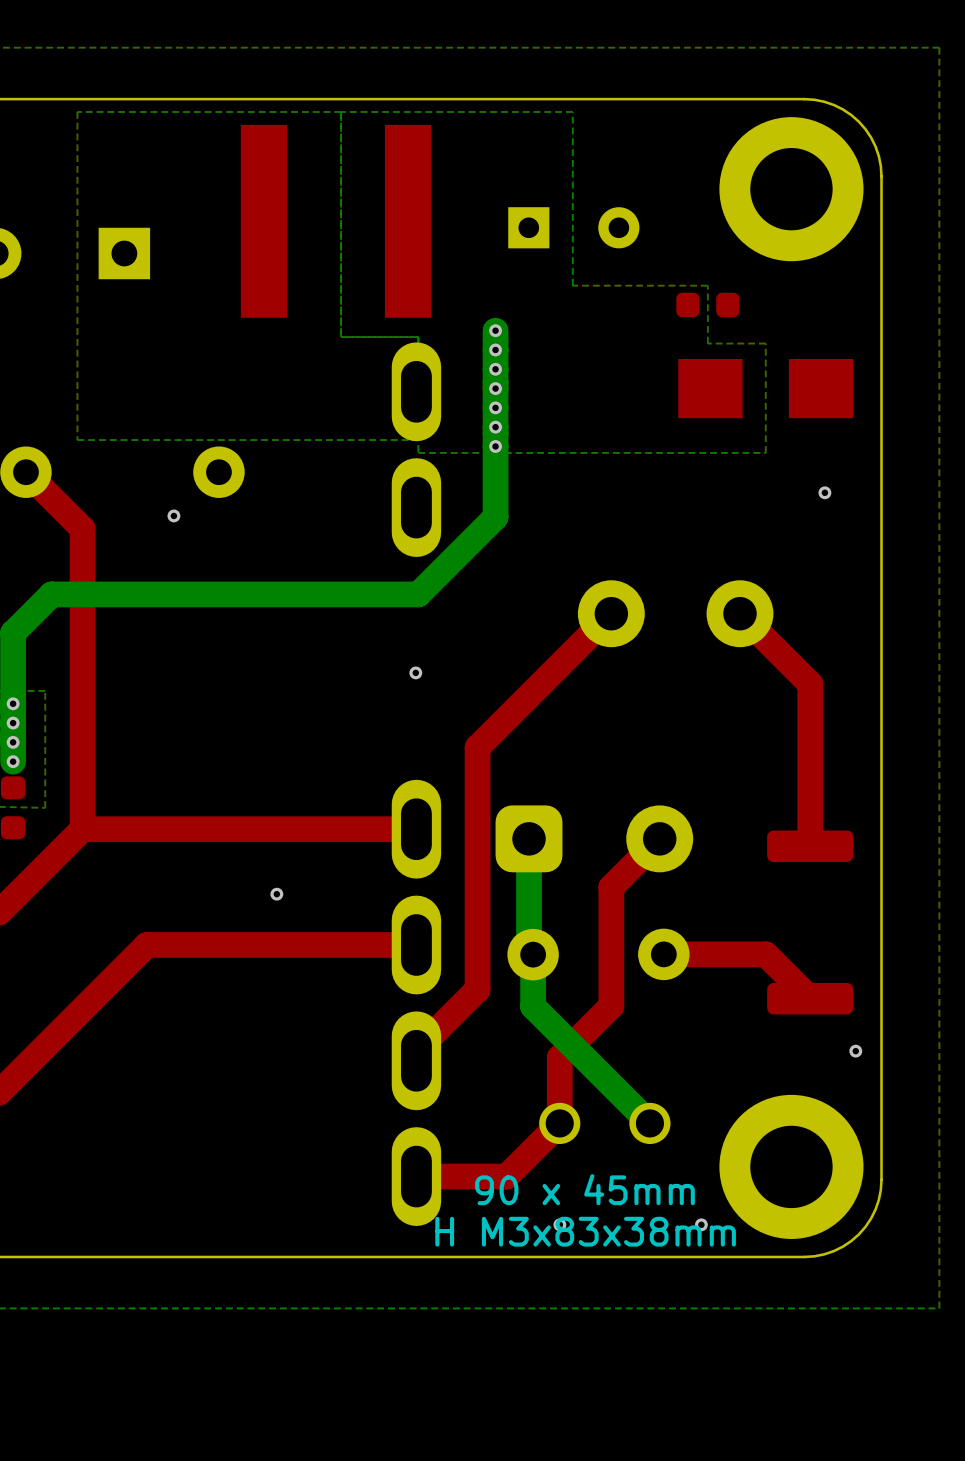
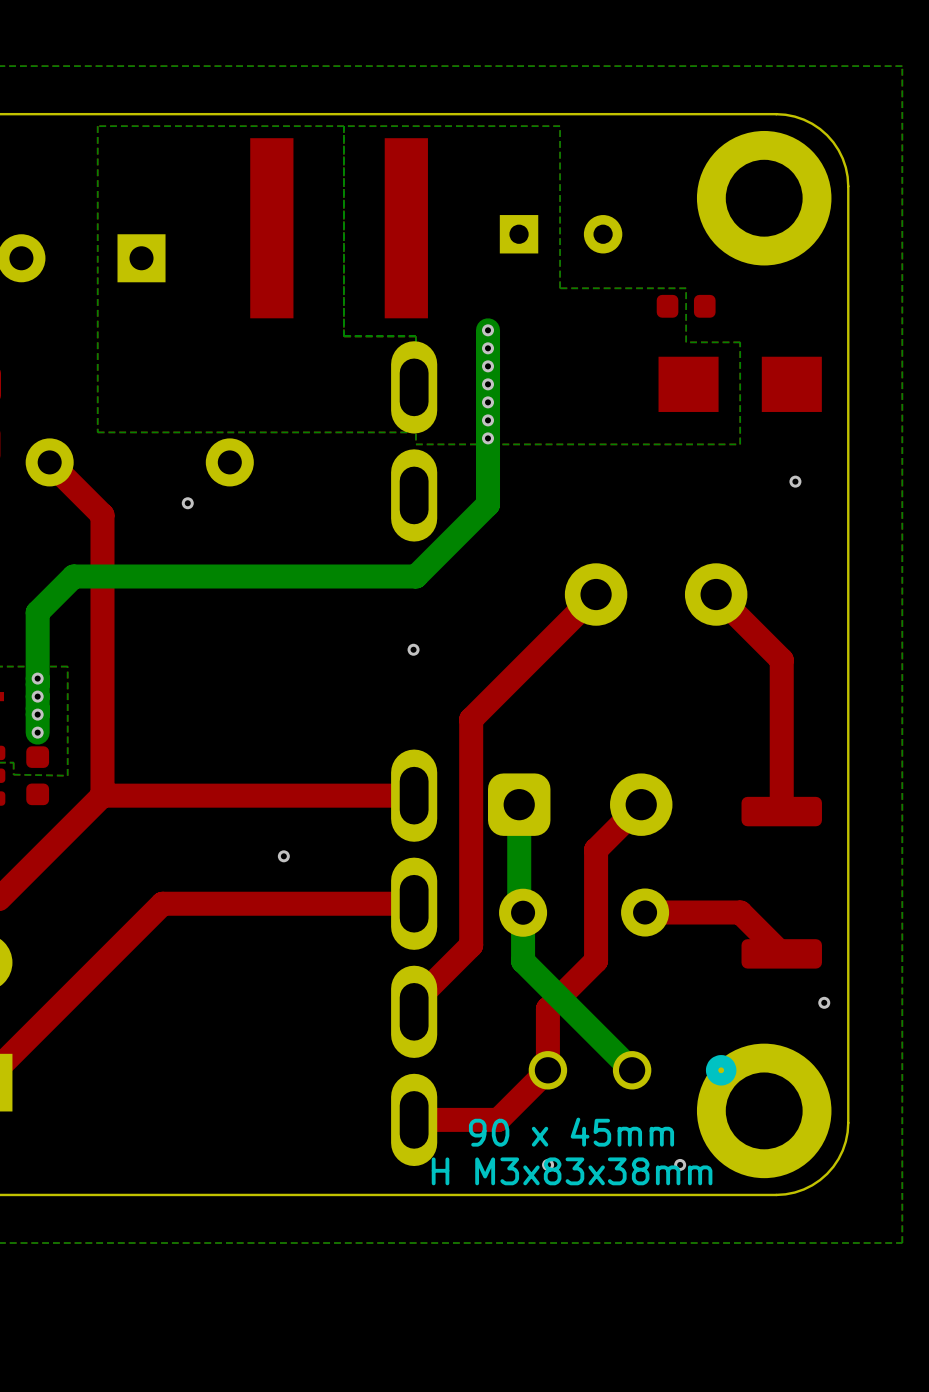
part: none -> (632, 1070)

